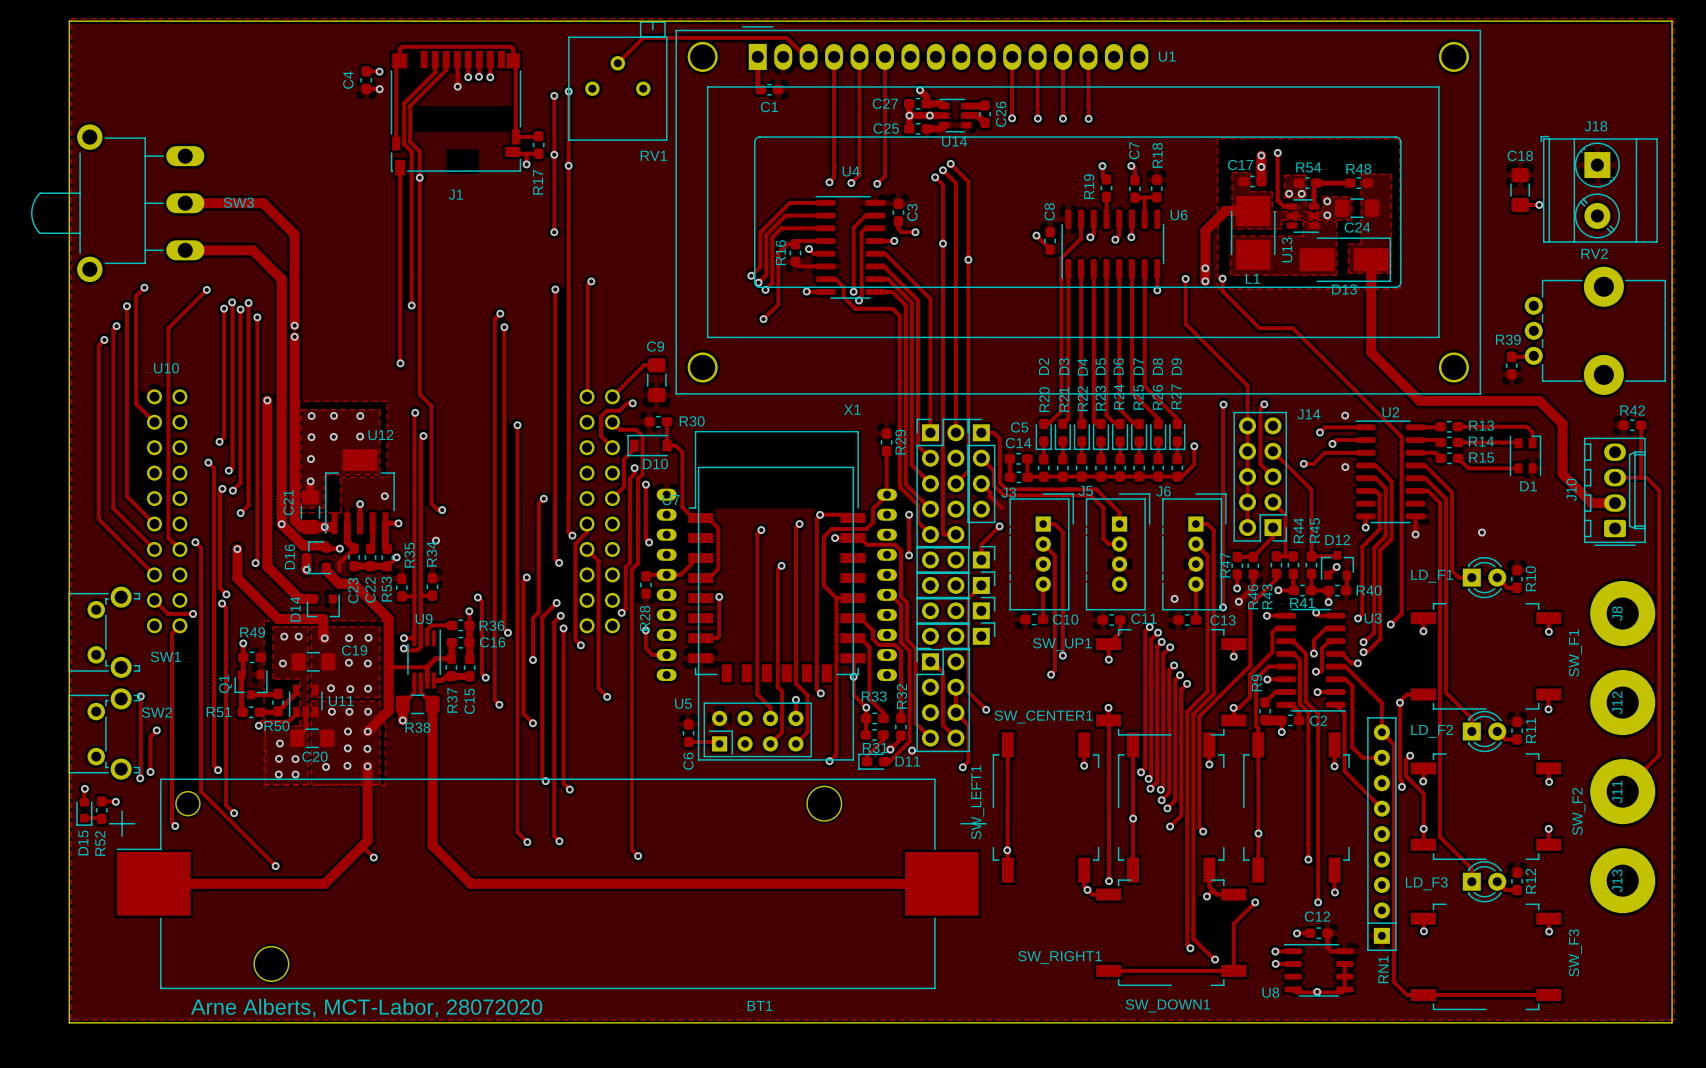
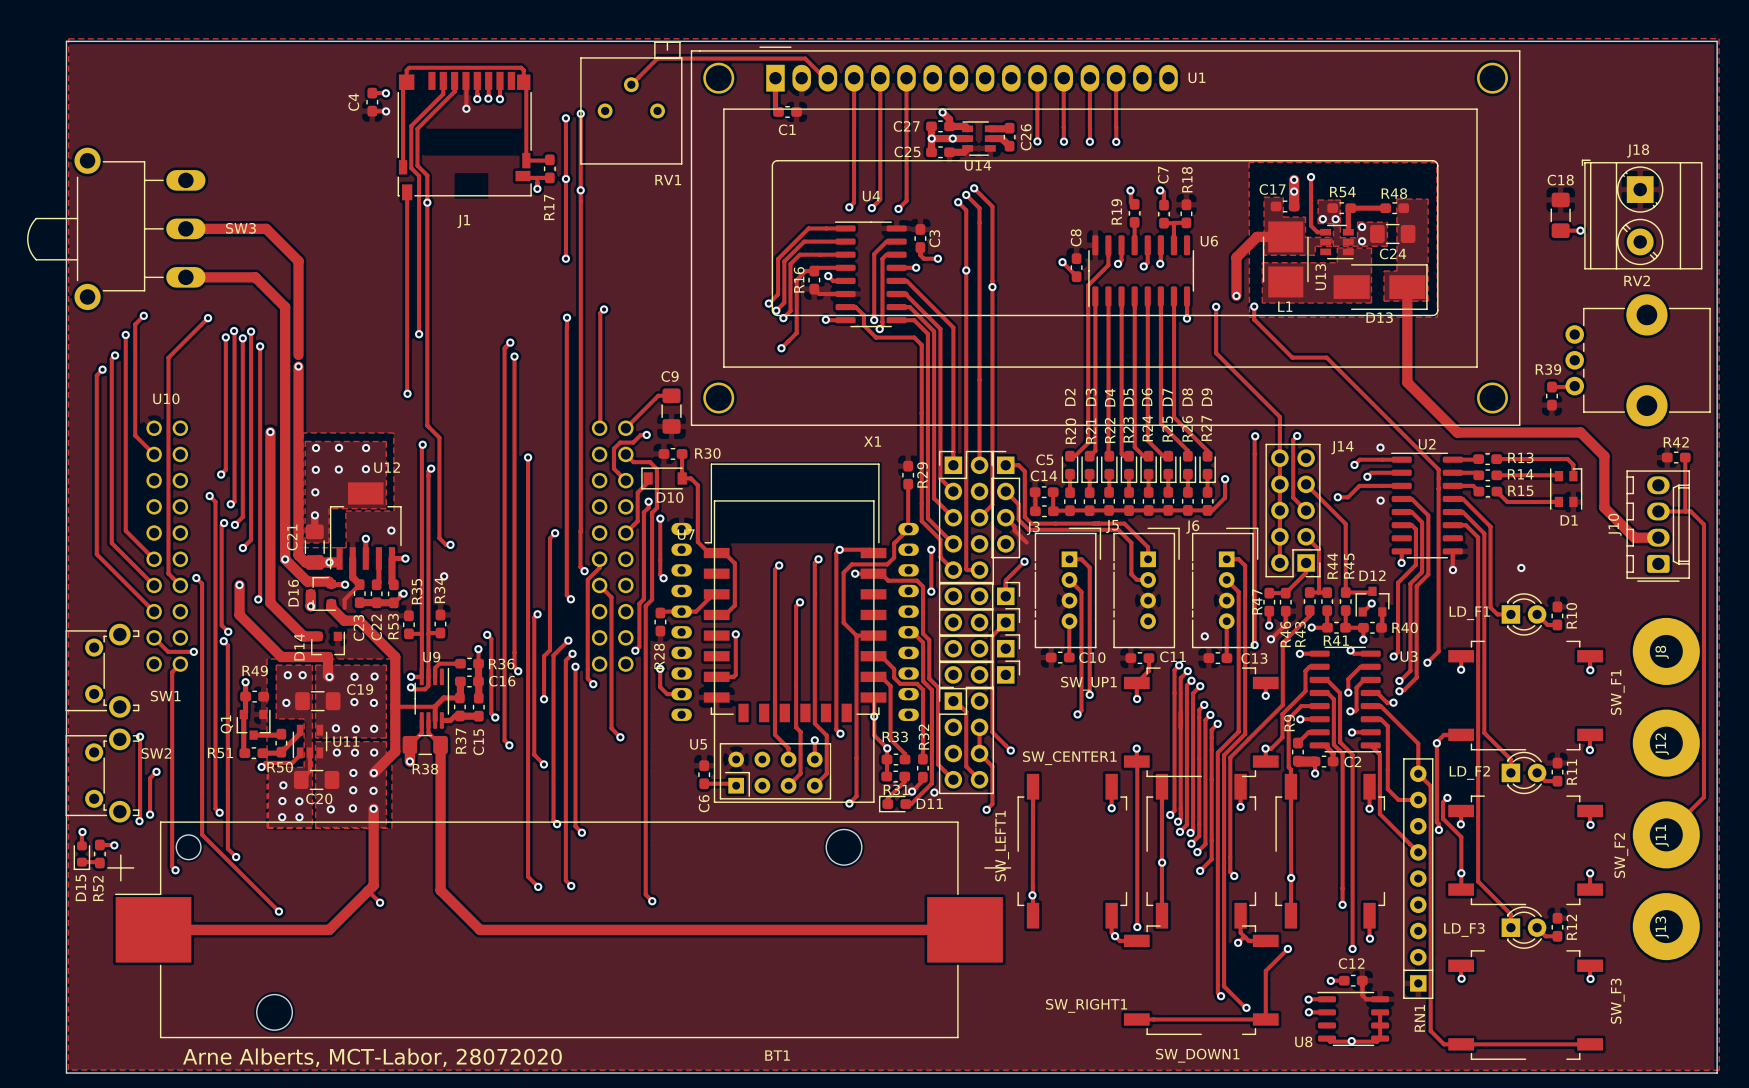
track: (1205, 268) (1205, 281) -> none
via: (1205, 281) -> none
via: (294, 325) -> none

